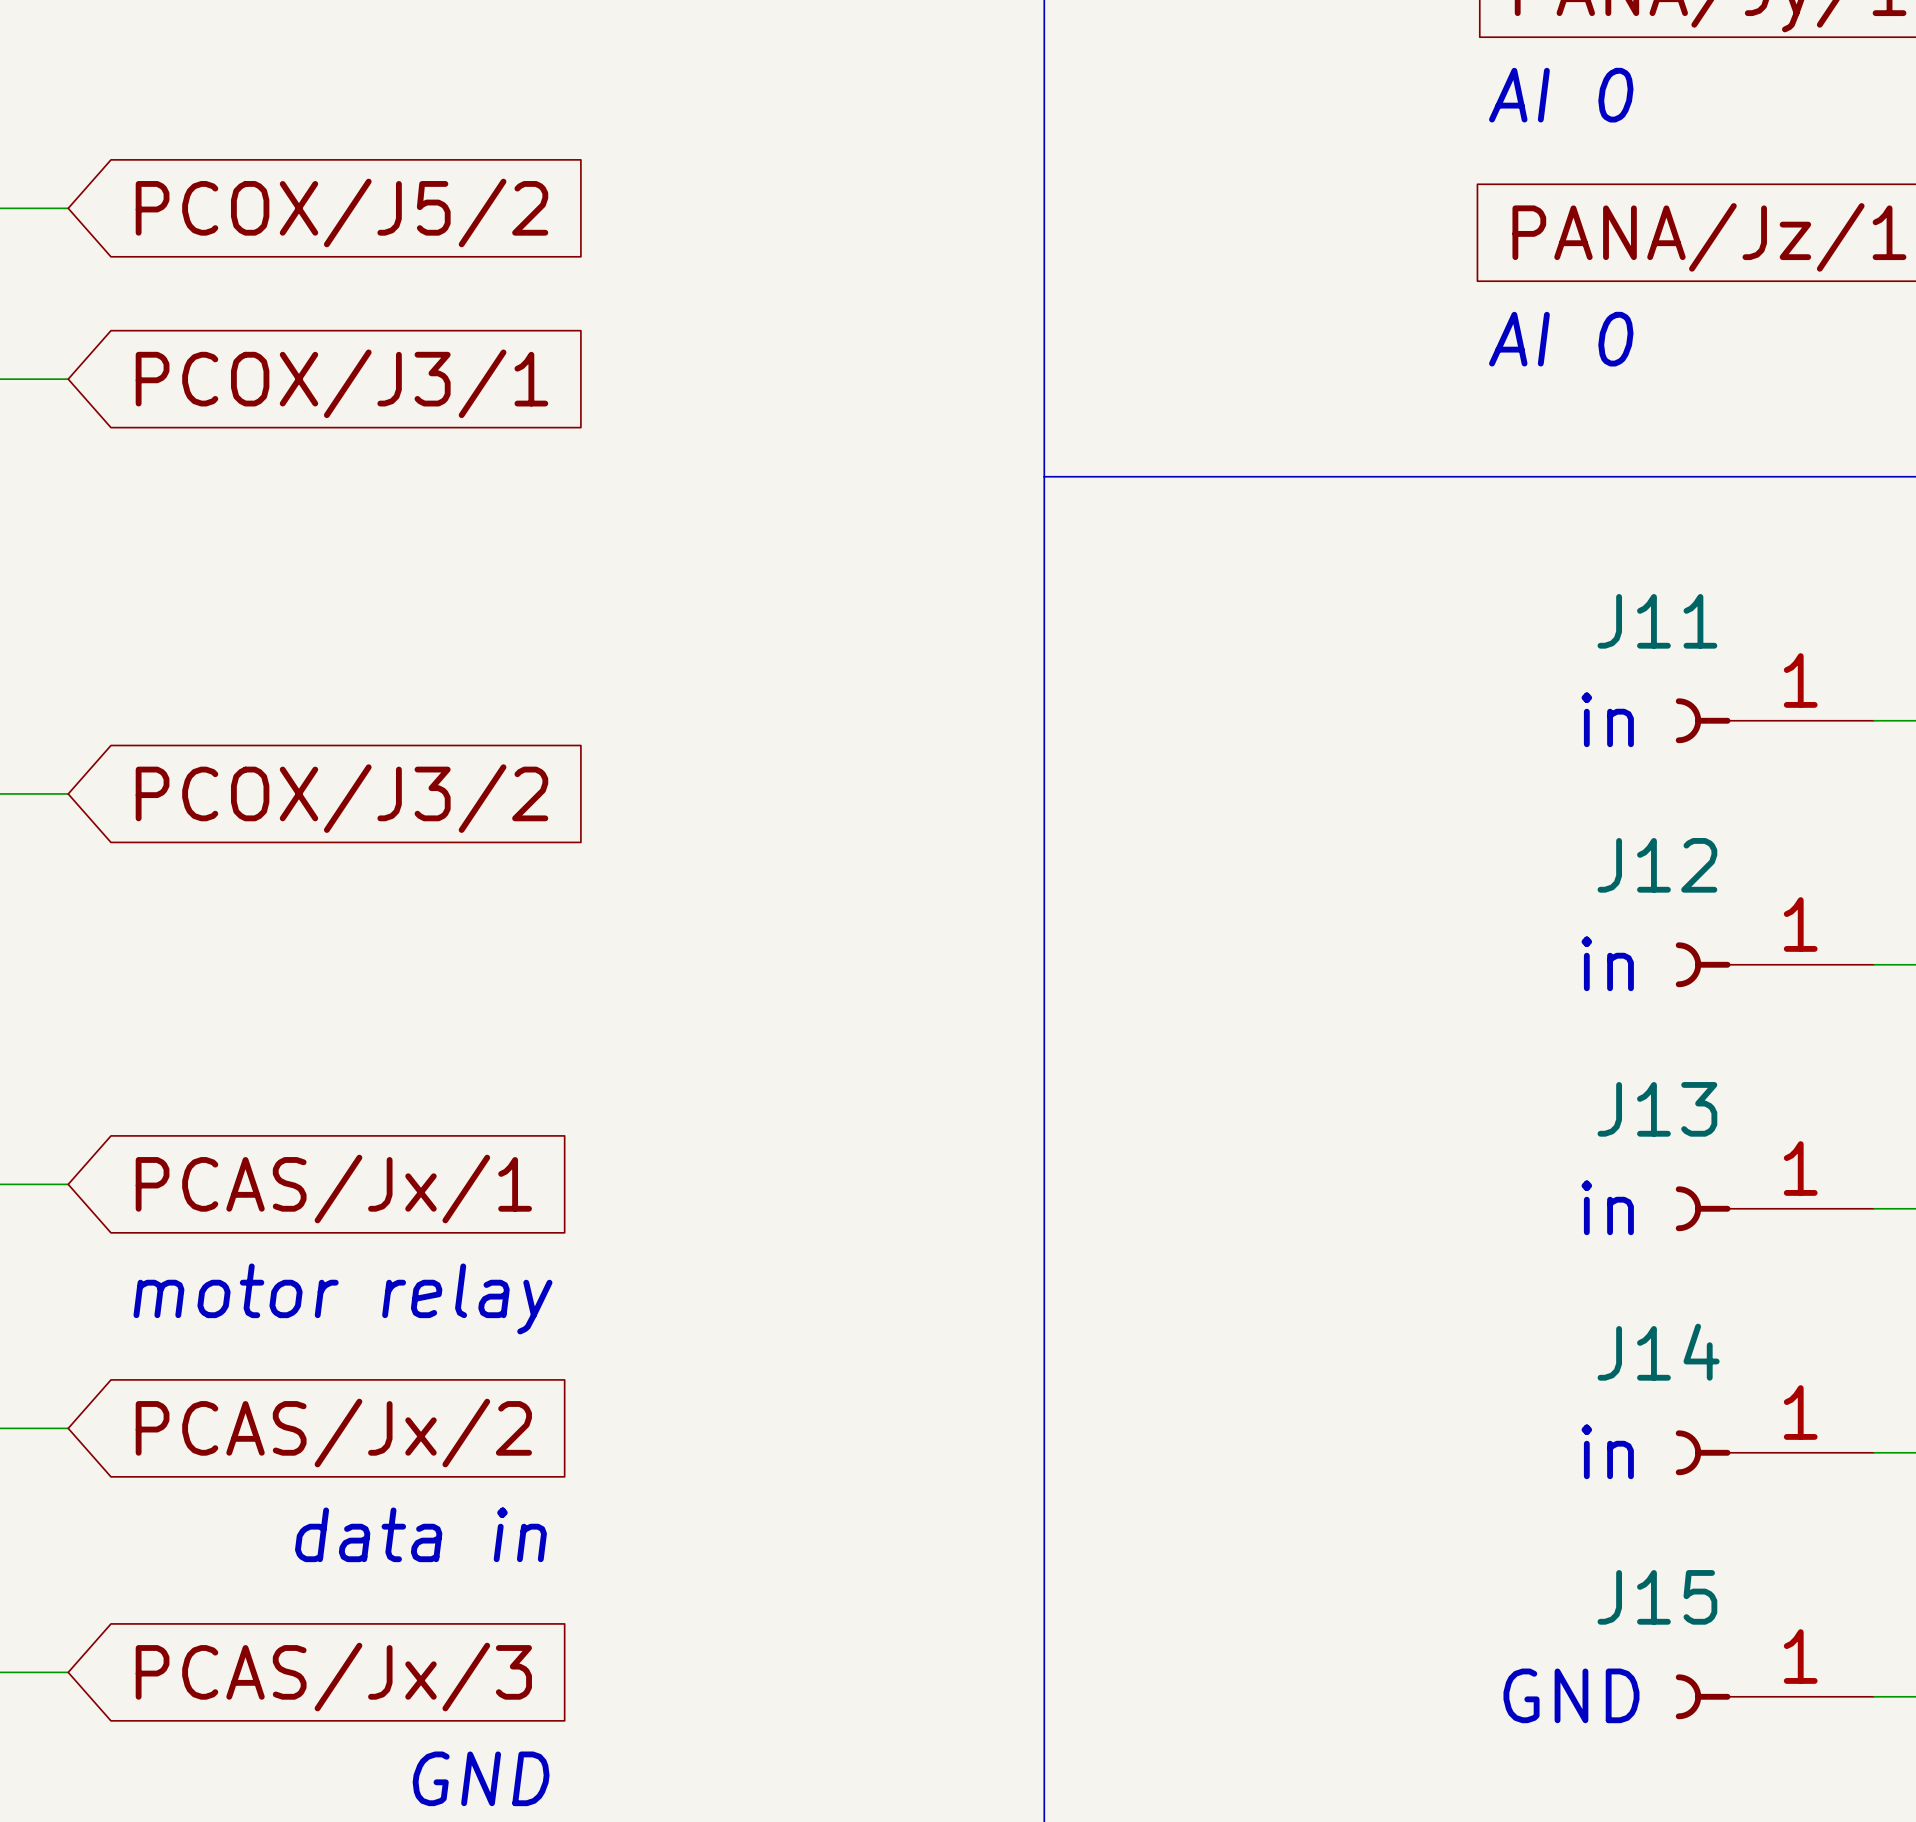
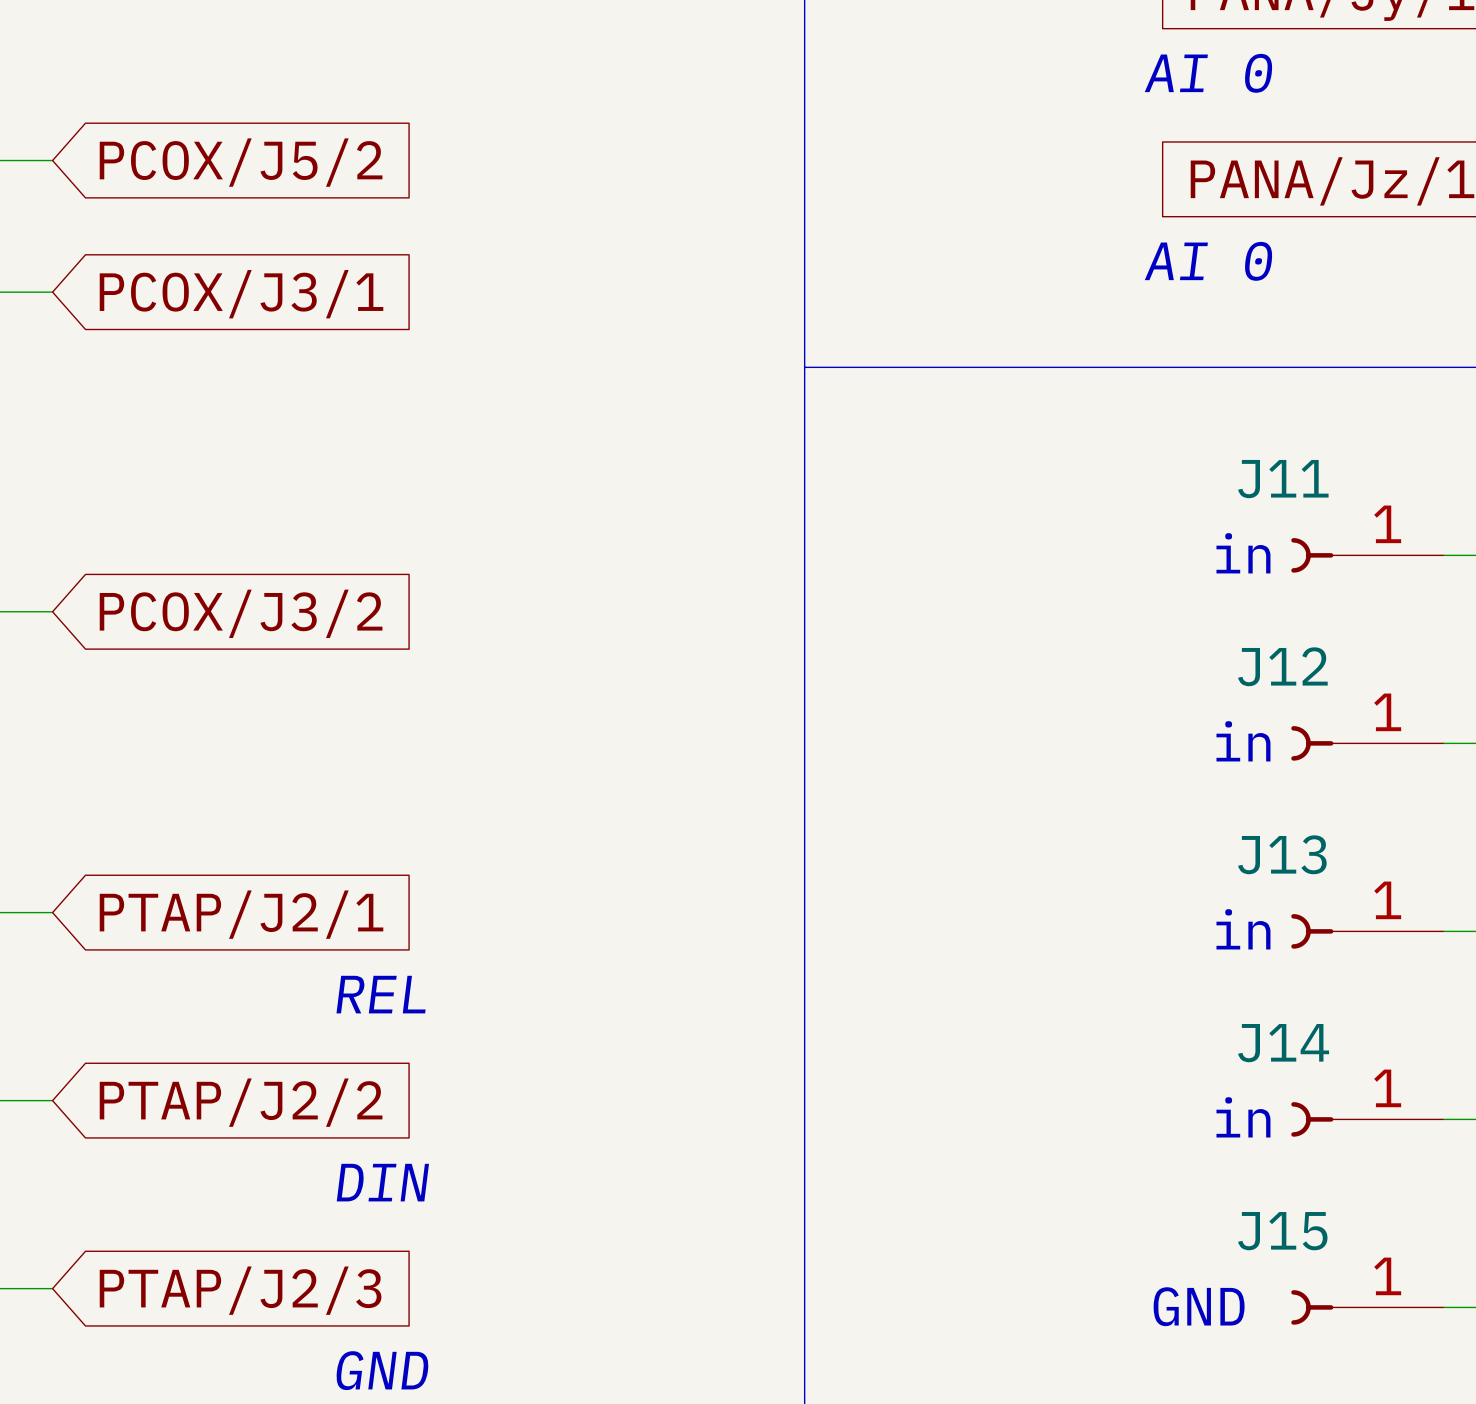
global label: PCAS/Jx/1 (333, 1189) -> PTAP/J2/1 (241, 914)
text: motor relay (342, 1298) -> REL (381, 994)
global label: PCAS/Jx/2 (333, 1433) -> PTAP/J2/2 (241, 1102)
text: data in (420, 1534) -> DIN (382, 1182)
global label: PCAS/Jx/3 (333, 1677) -> PTAP/J2/3 (240, 1290)

